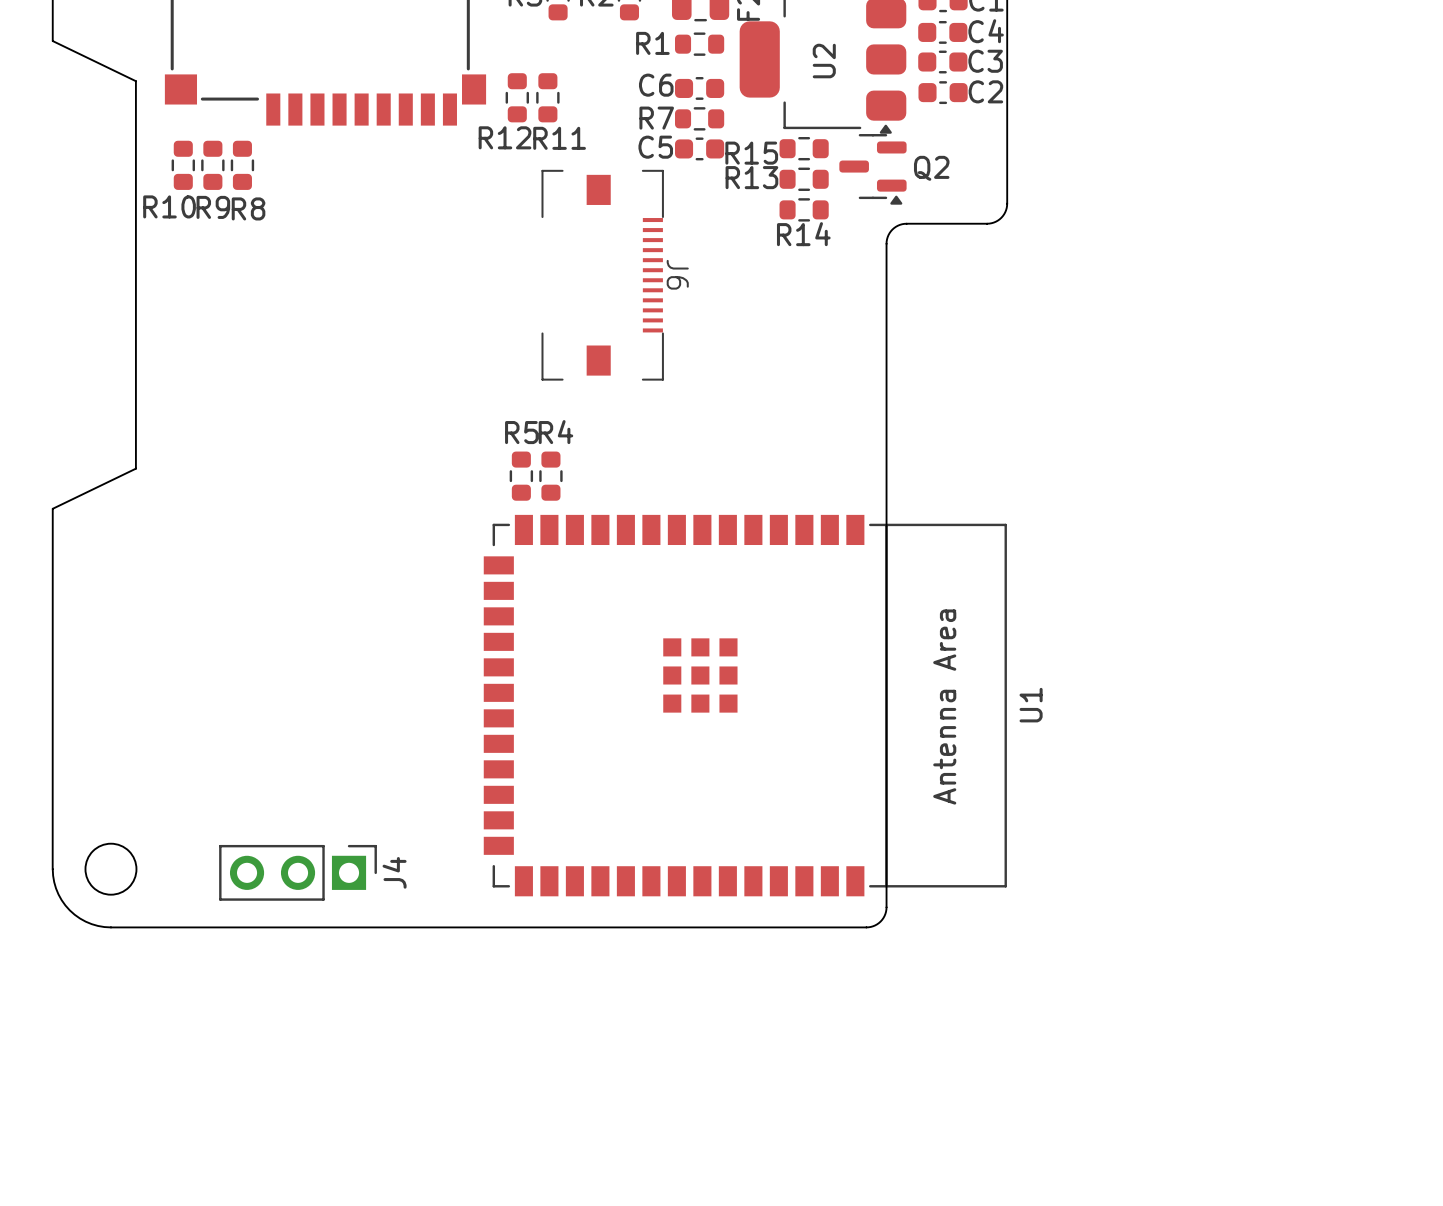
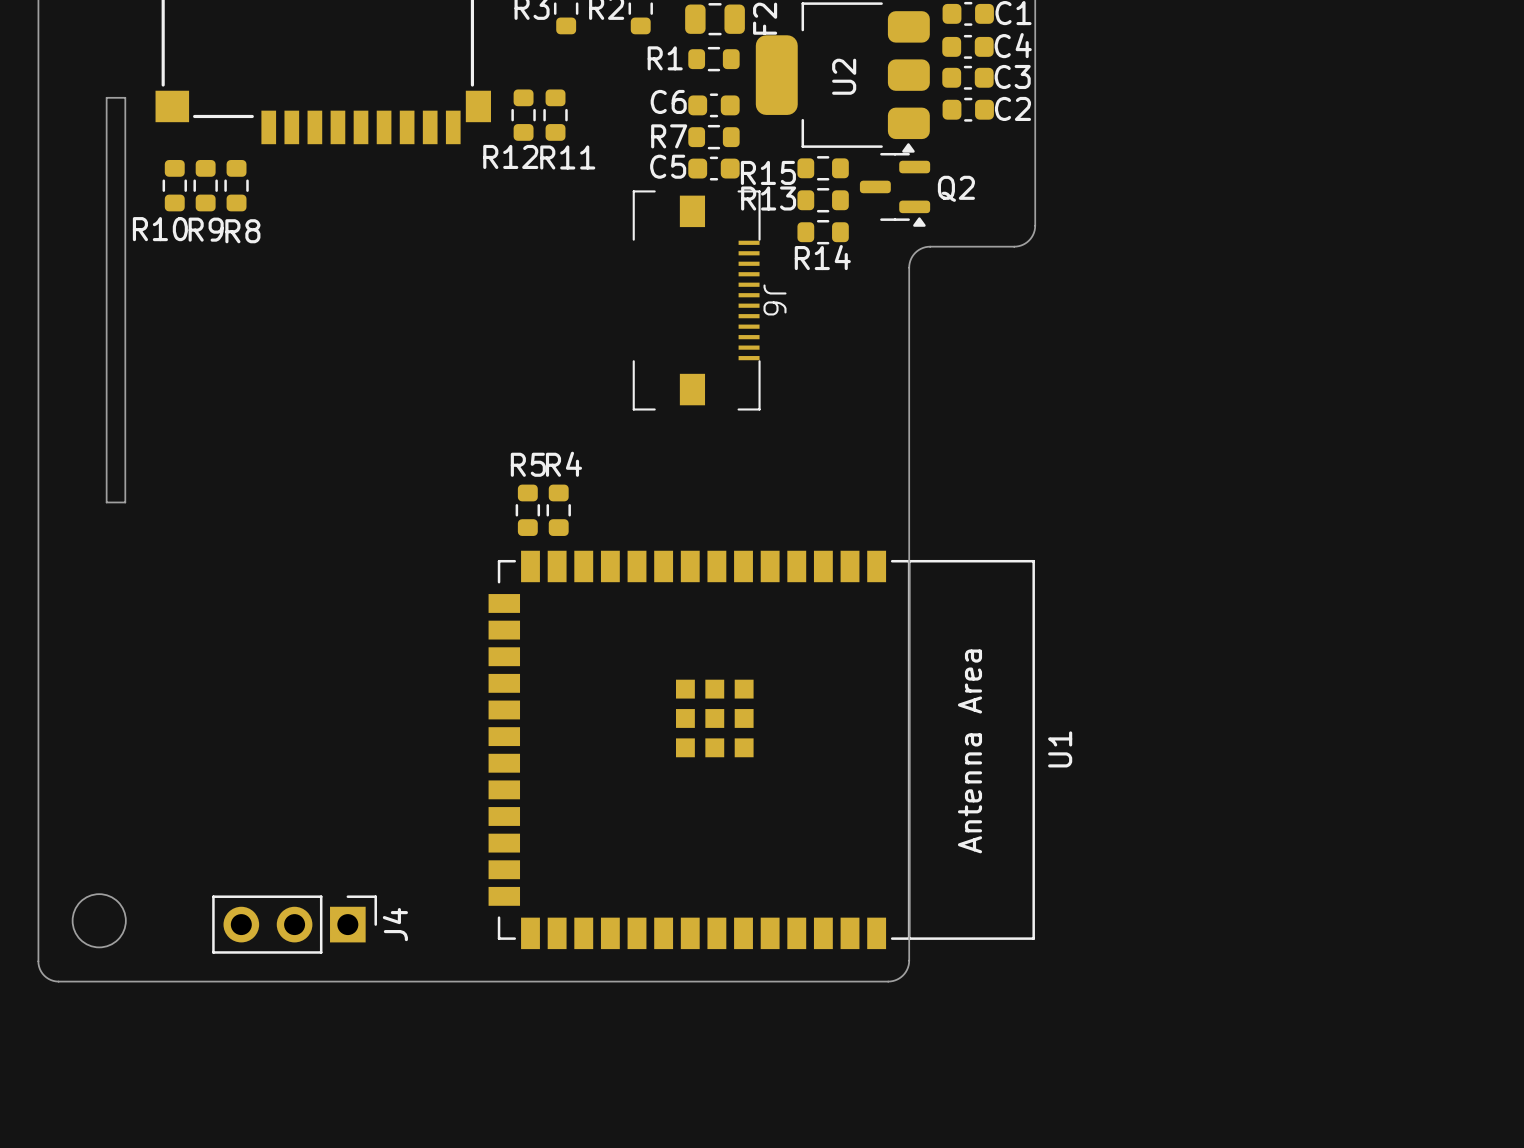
board edge: (52, 41) (135, 81) -> (125, 502) (106, 502) (106, 97) (125, 97)
board edge: none -> (38, 55) (38, 961)
J6 position: (602, 275) -> (696, 300)
board edge: (135, 468) (52, 508) (52, 869) -> none
board edge: (52, 869) (56, 888) (69, 910) (85, 921) (110, 927) -> (38, 961) (42, 973) (53, 980) (99, 981)

